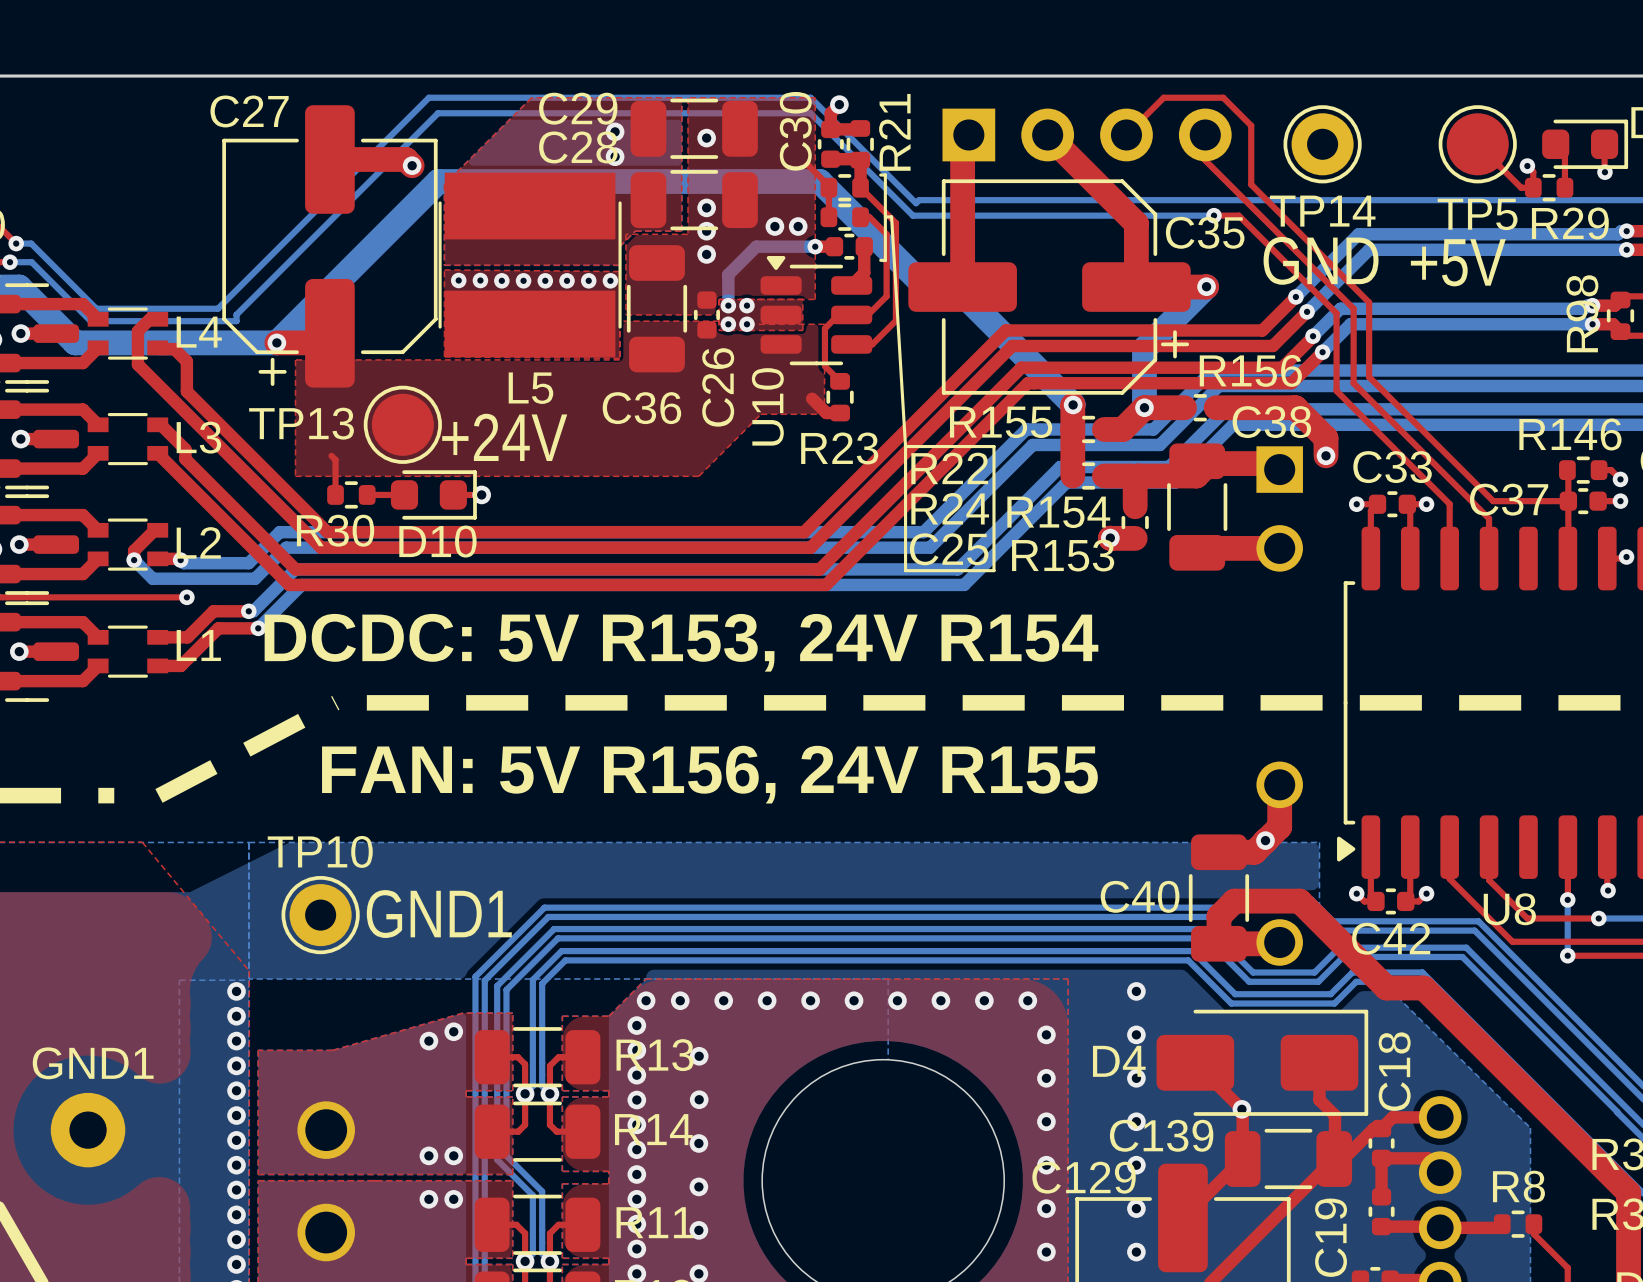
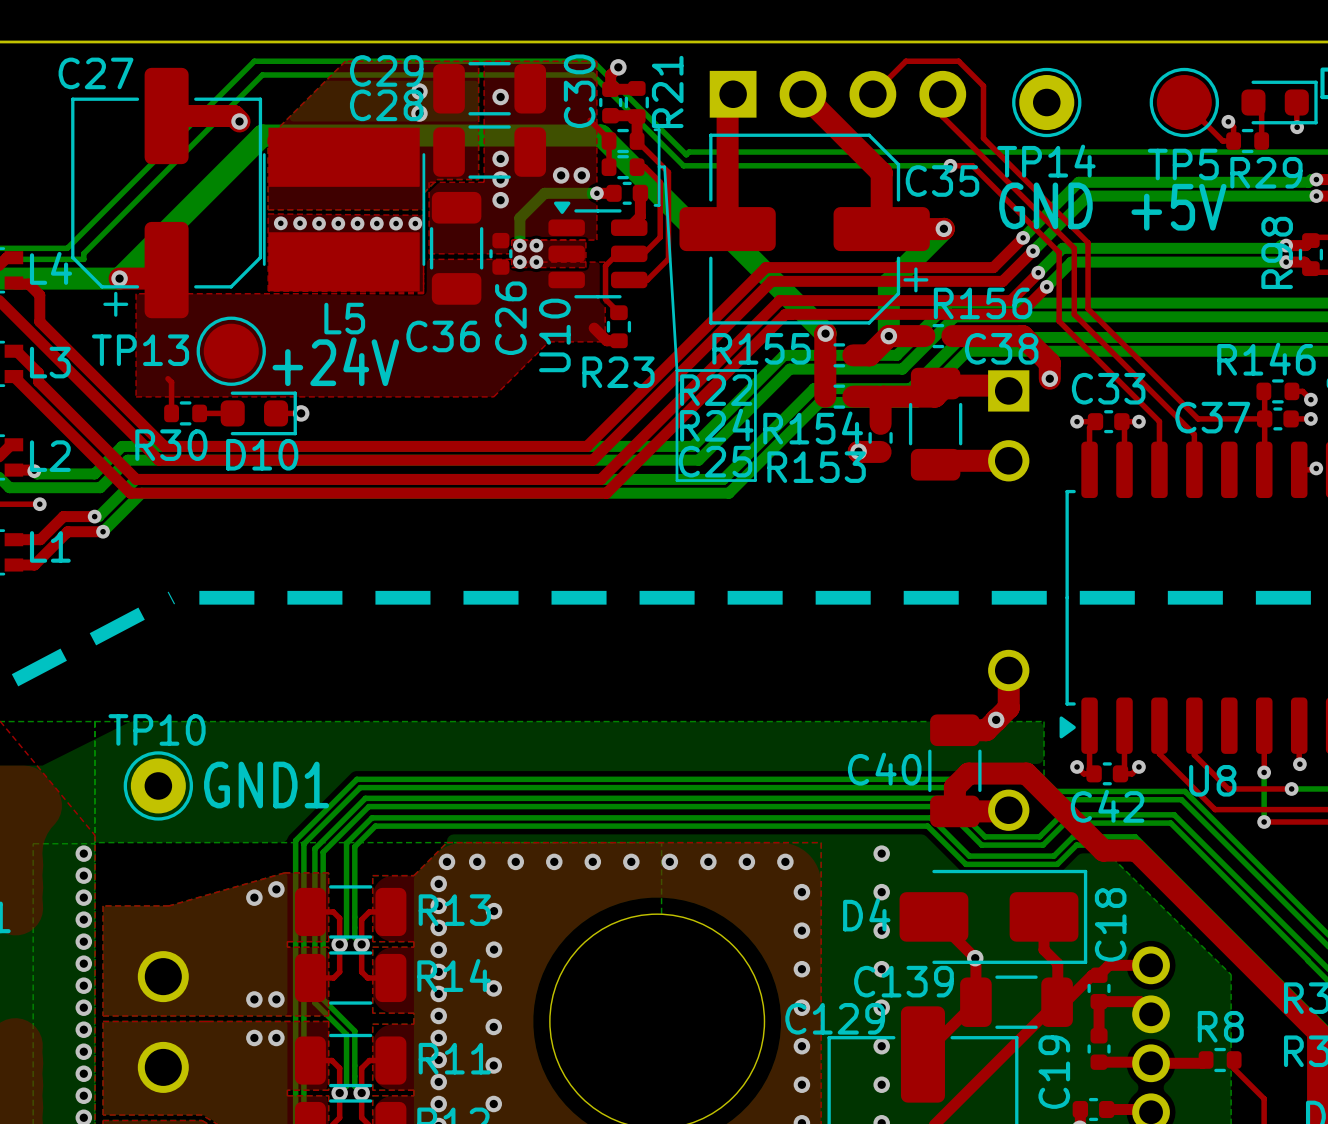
text: DCDC: 5V R153, 24V R154 (681, 642) -> none
text: FAN: 5V R156, 24V R155 (709, 774) -> none

